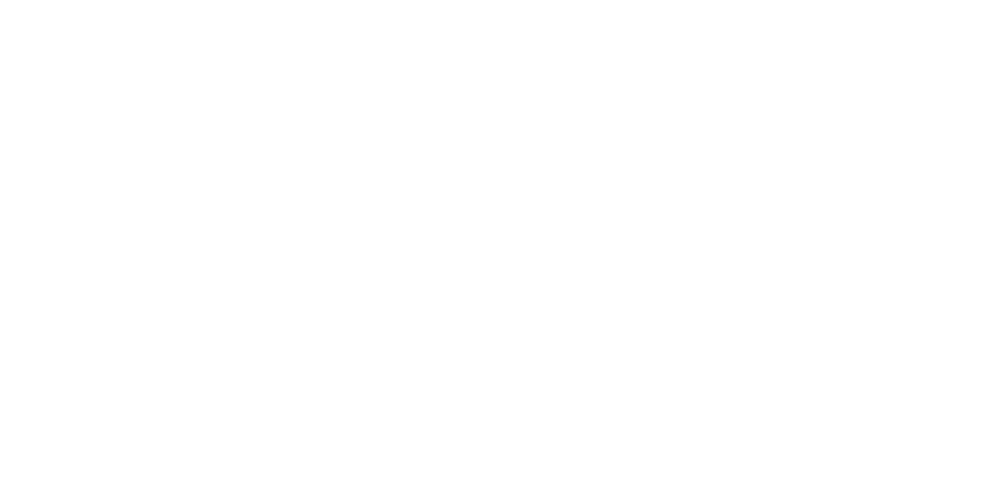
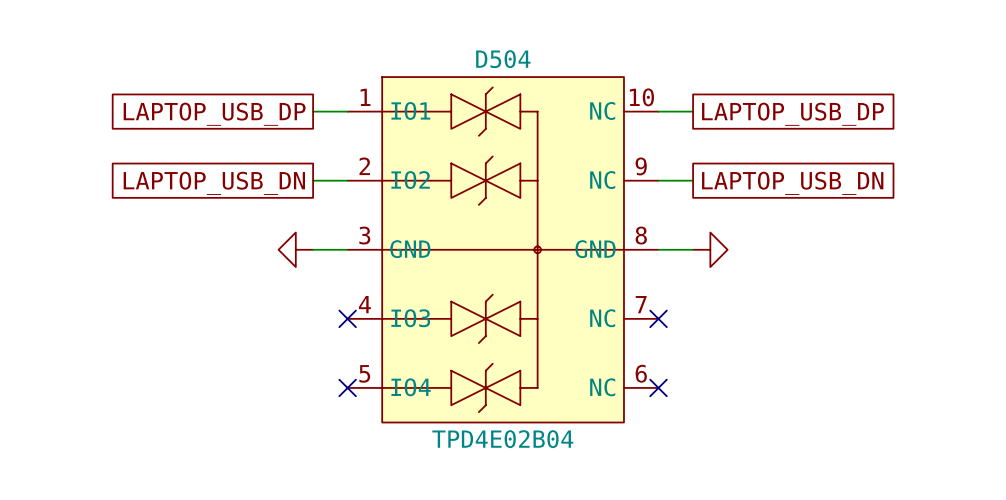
wire: none -> (313, 111) (347, 111)
wire: none -> (658, 111) (693, 111)
global label: none -> LAPTOP_USB_DP (214, 114)
global label: none -> LAPTOP_USB_DP (792, 114)
wire: none -> (313, 180) (347, 180)
wire: none -> (658, 180) (693, 180)
global label: none -> LAPTOP_USB_DN (214, 183)
global label: none -> LAPTOP_USB_DN (792, 183)
power symbol: none -> (295, 249)
wire: none -> (313, 249) (347, 249)
D504: none -> TPD4E02B04 (503, 249)
wire: none -> (658, 249) (693, 249)
power symbol: none -> (710, 249)
no-connect mark: none -> (347, 318)
no-connect mark: none -> (658, 318)
no-connect mark: none -> (347, 387)
no-connect mark: none -> (658, 387)

